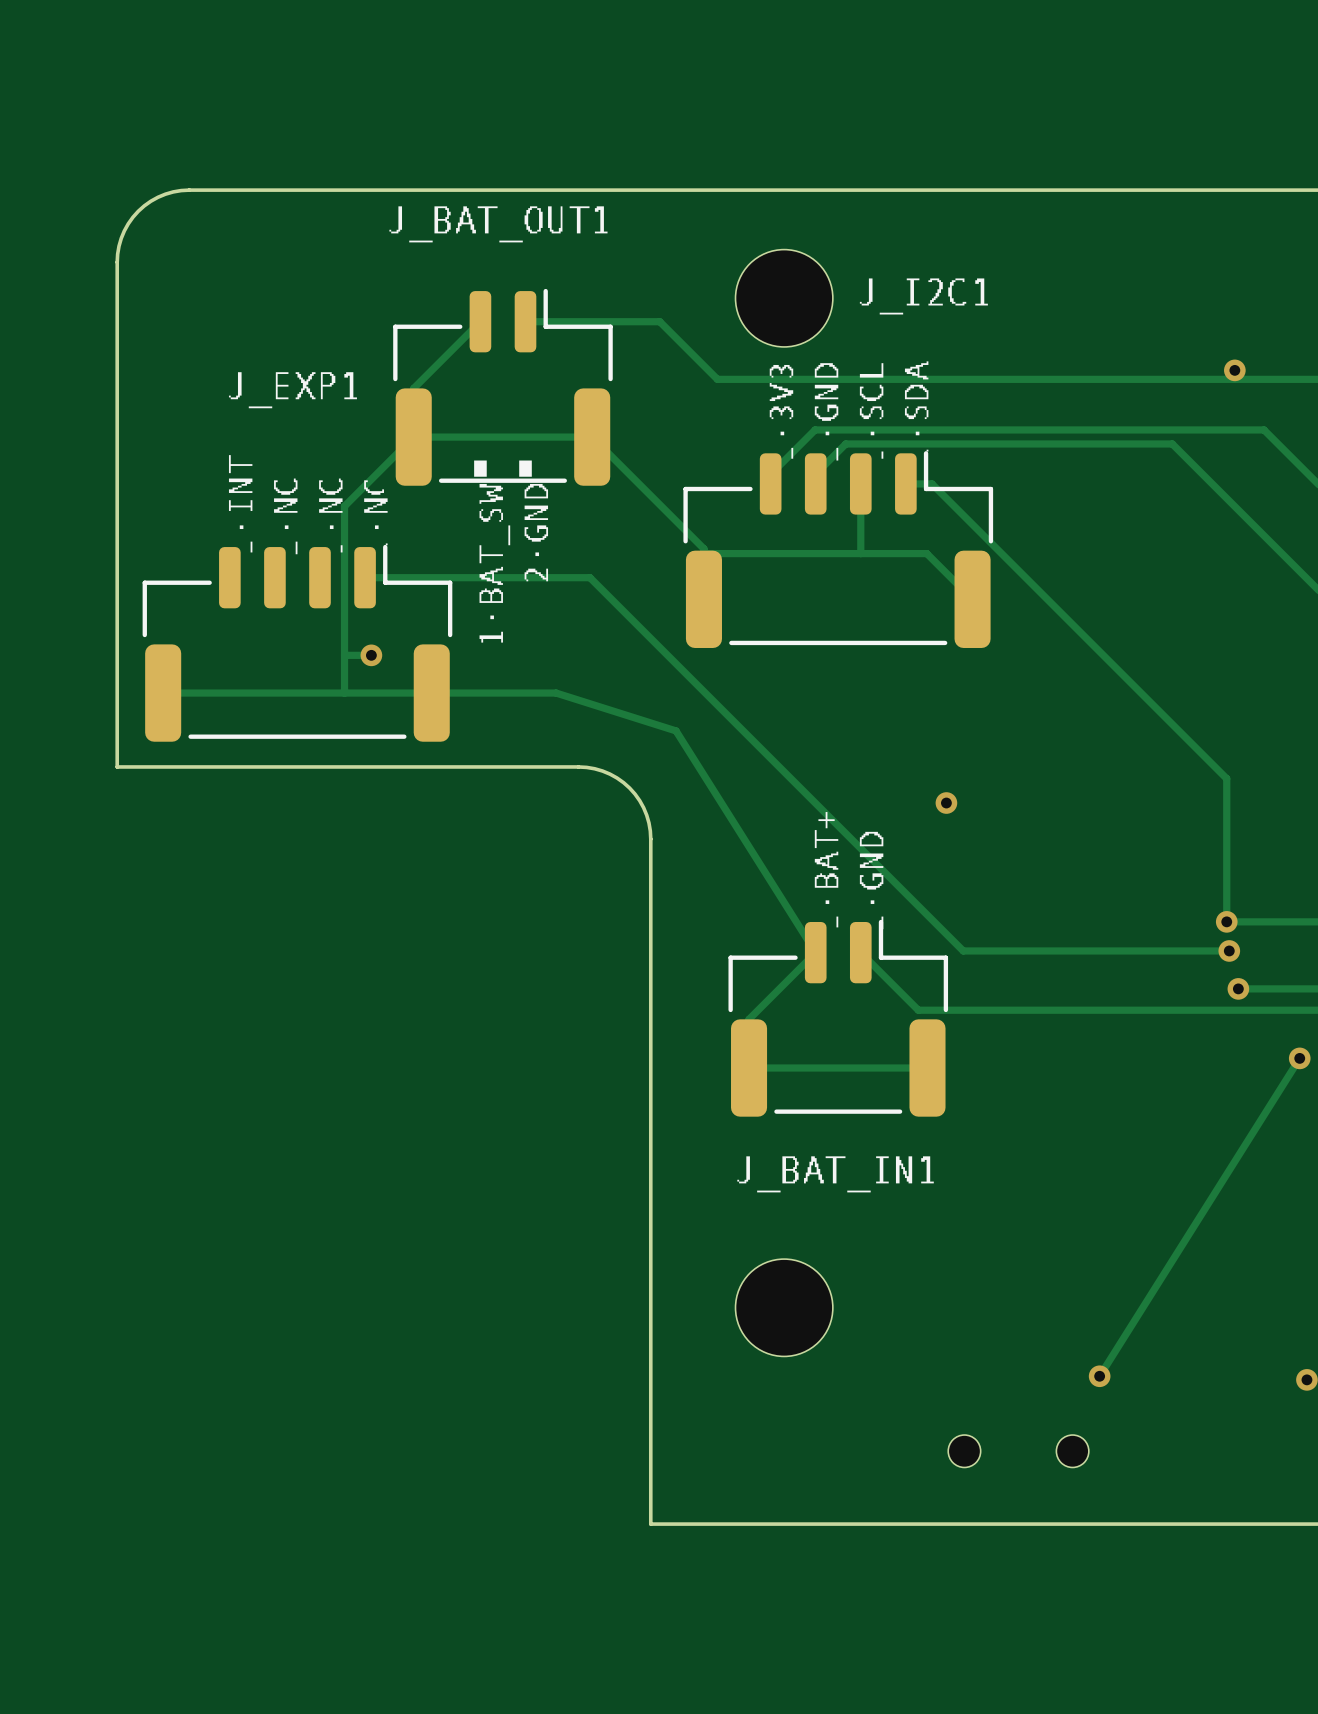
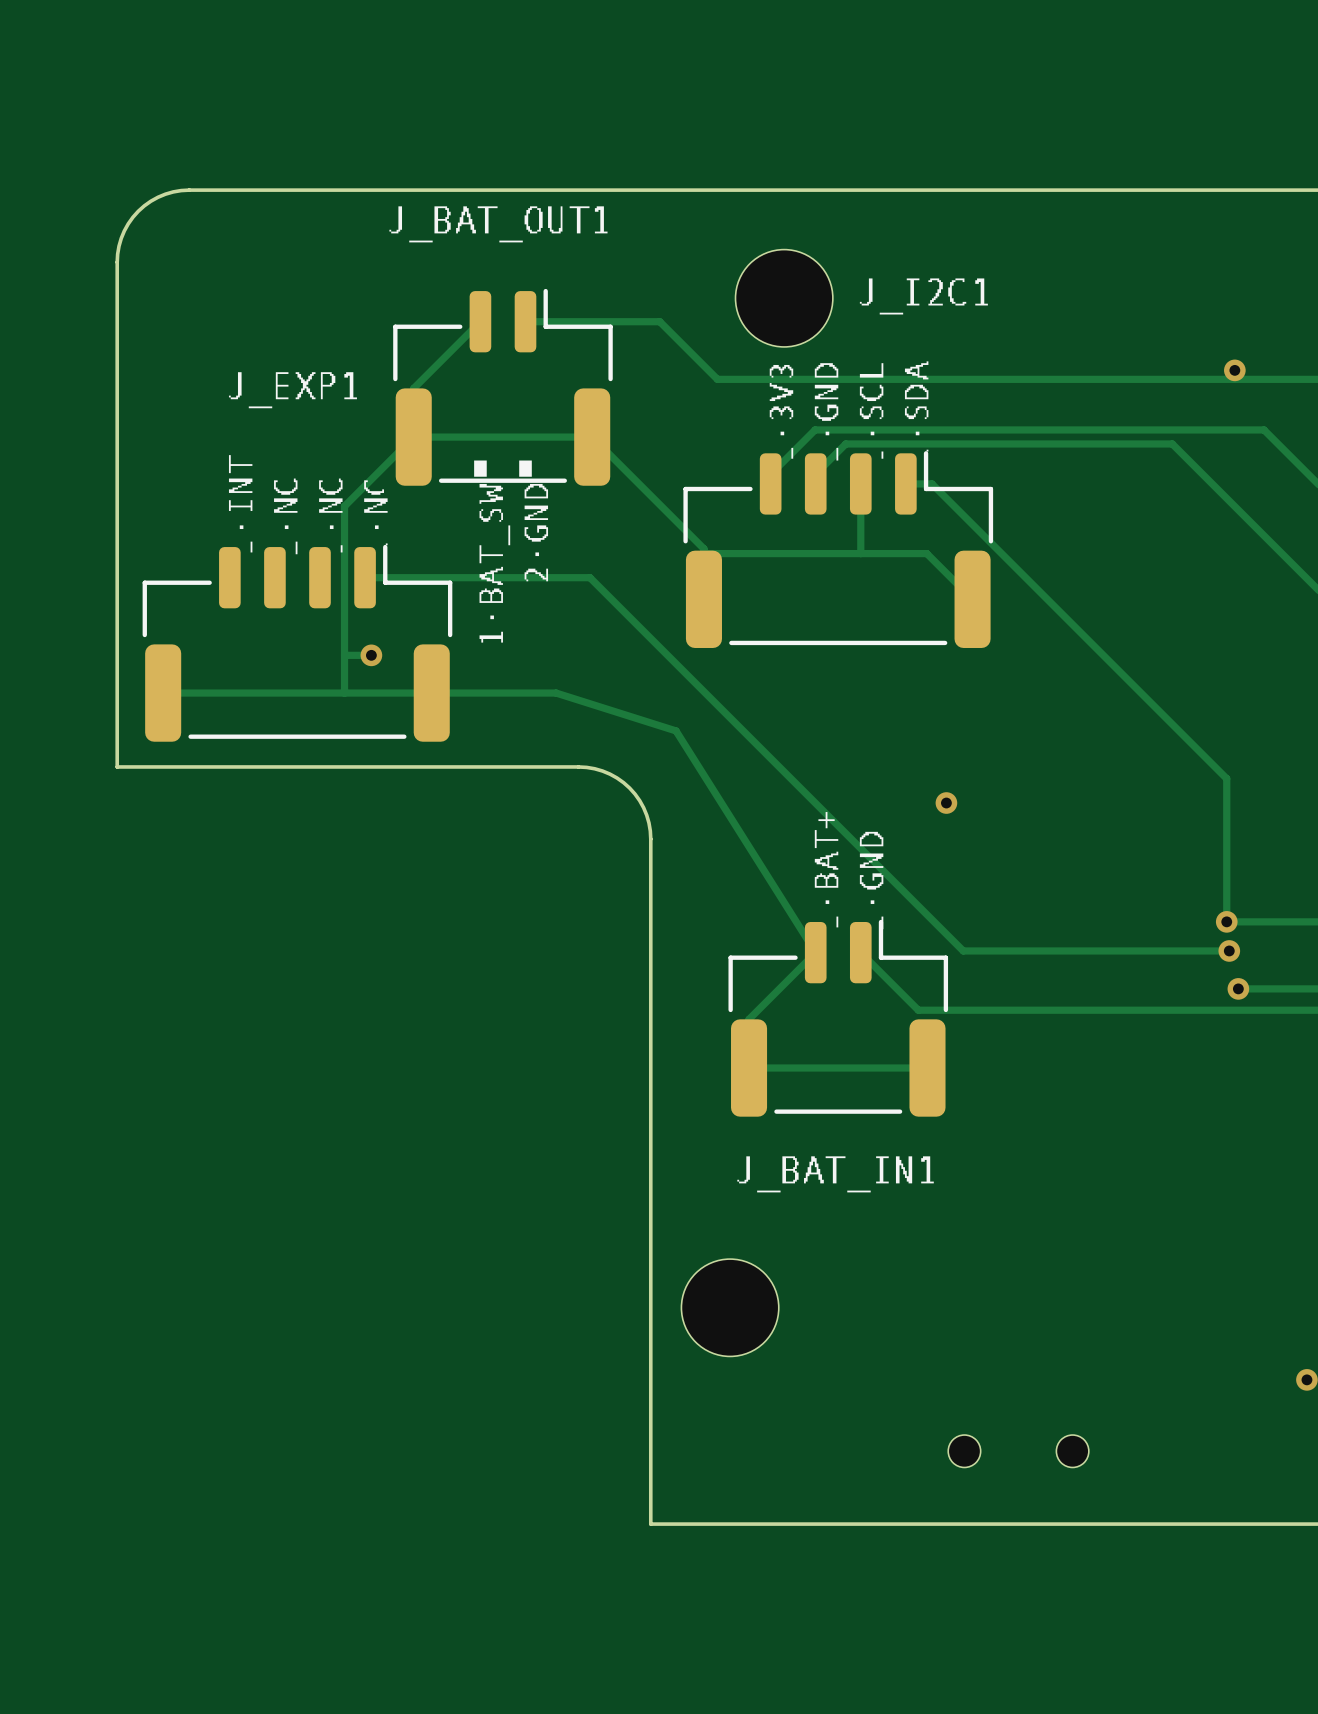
track: (1299, 1058) (1099, 1376) -> none
via: (1299, 1058) -> none
part position: (784, 1307) -> (730, 1307)
via: (1099, 1376) -> none

